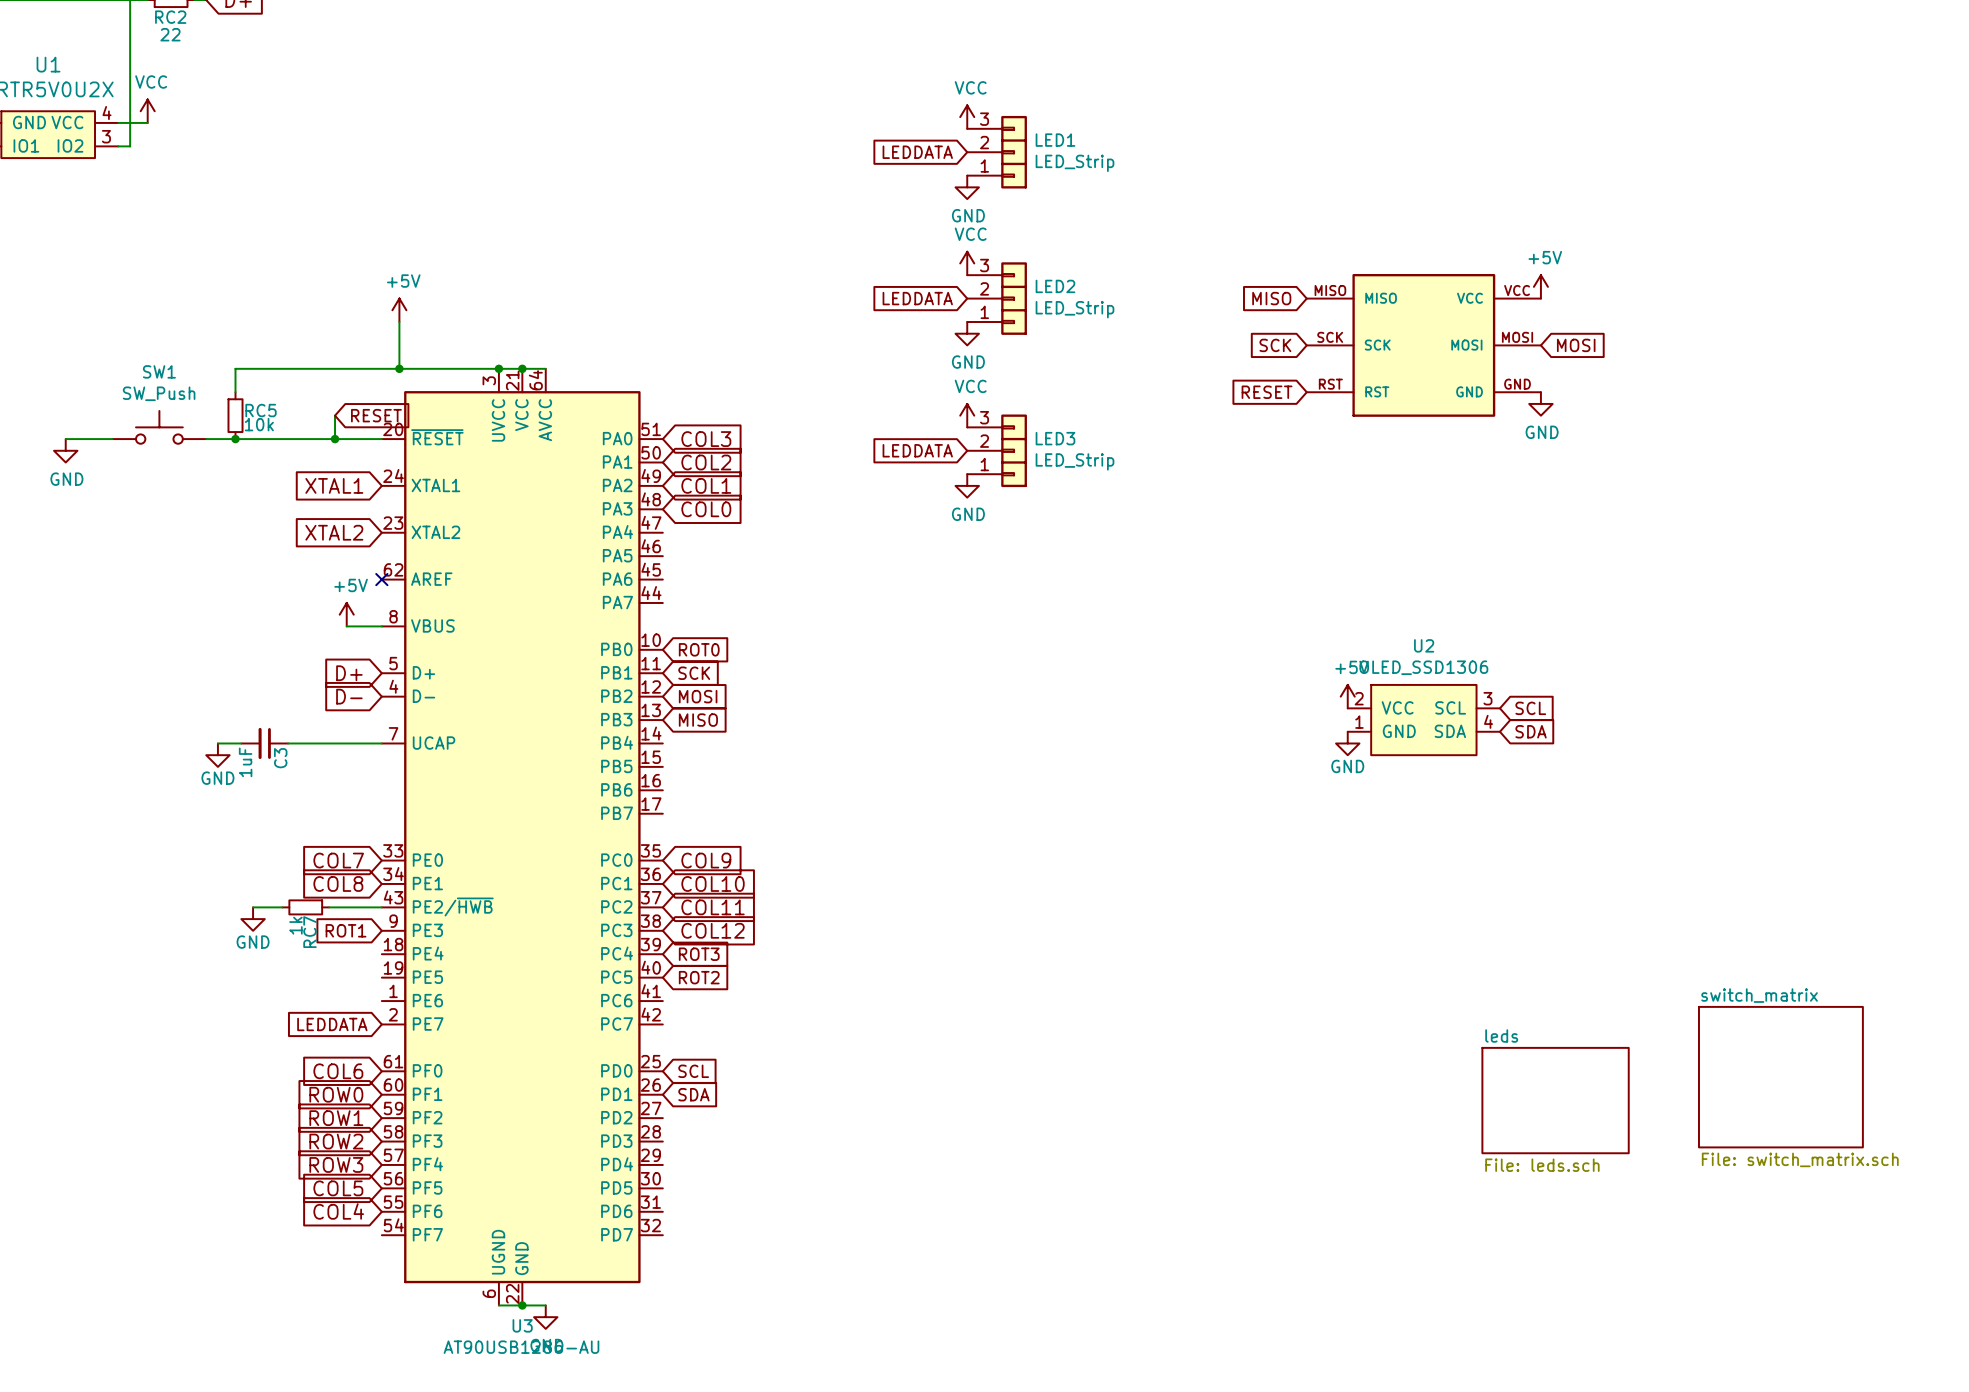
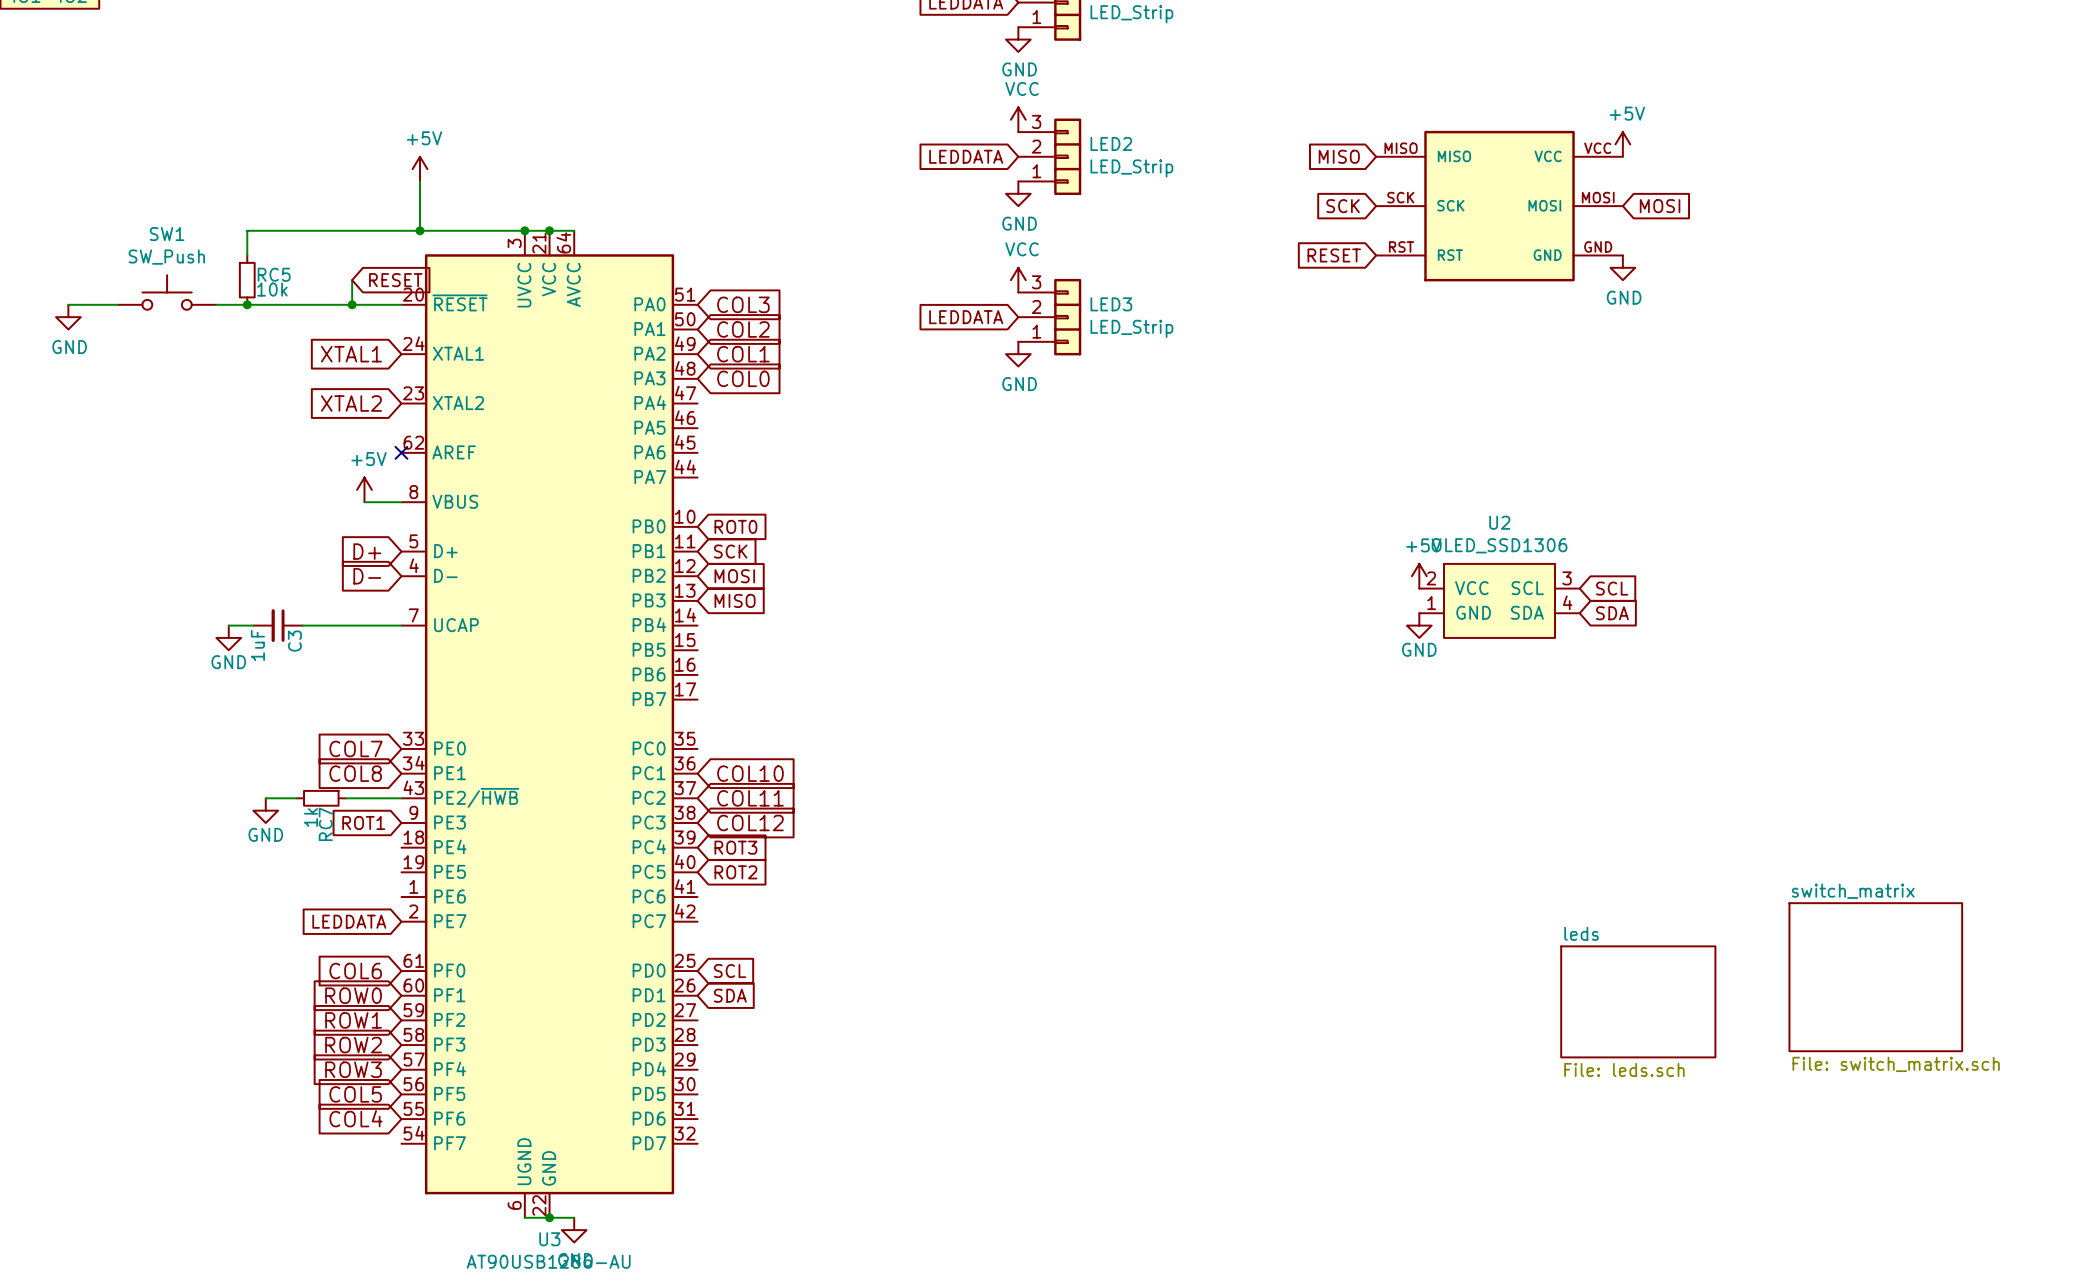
global label: COL9 (706, 860) -> none

